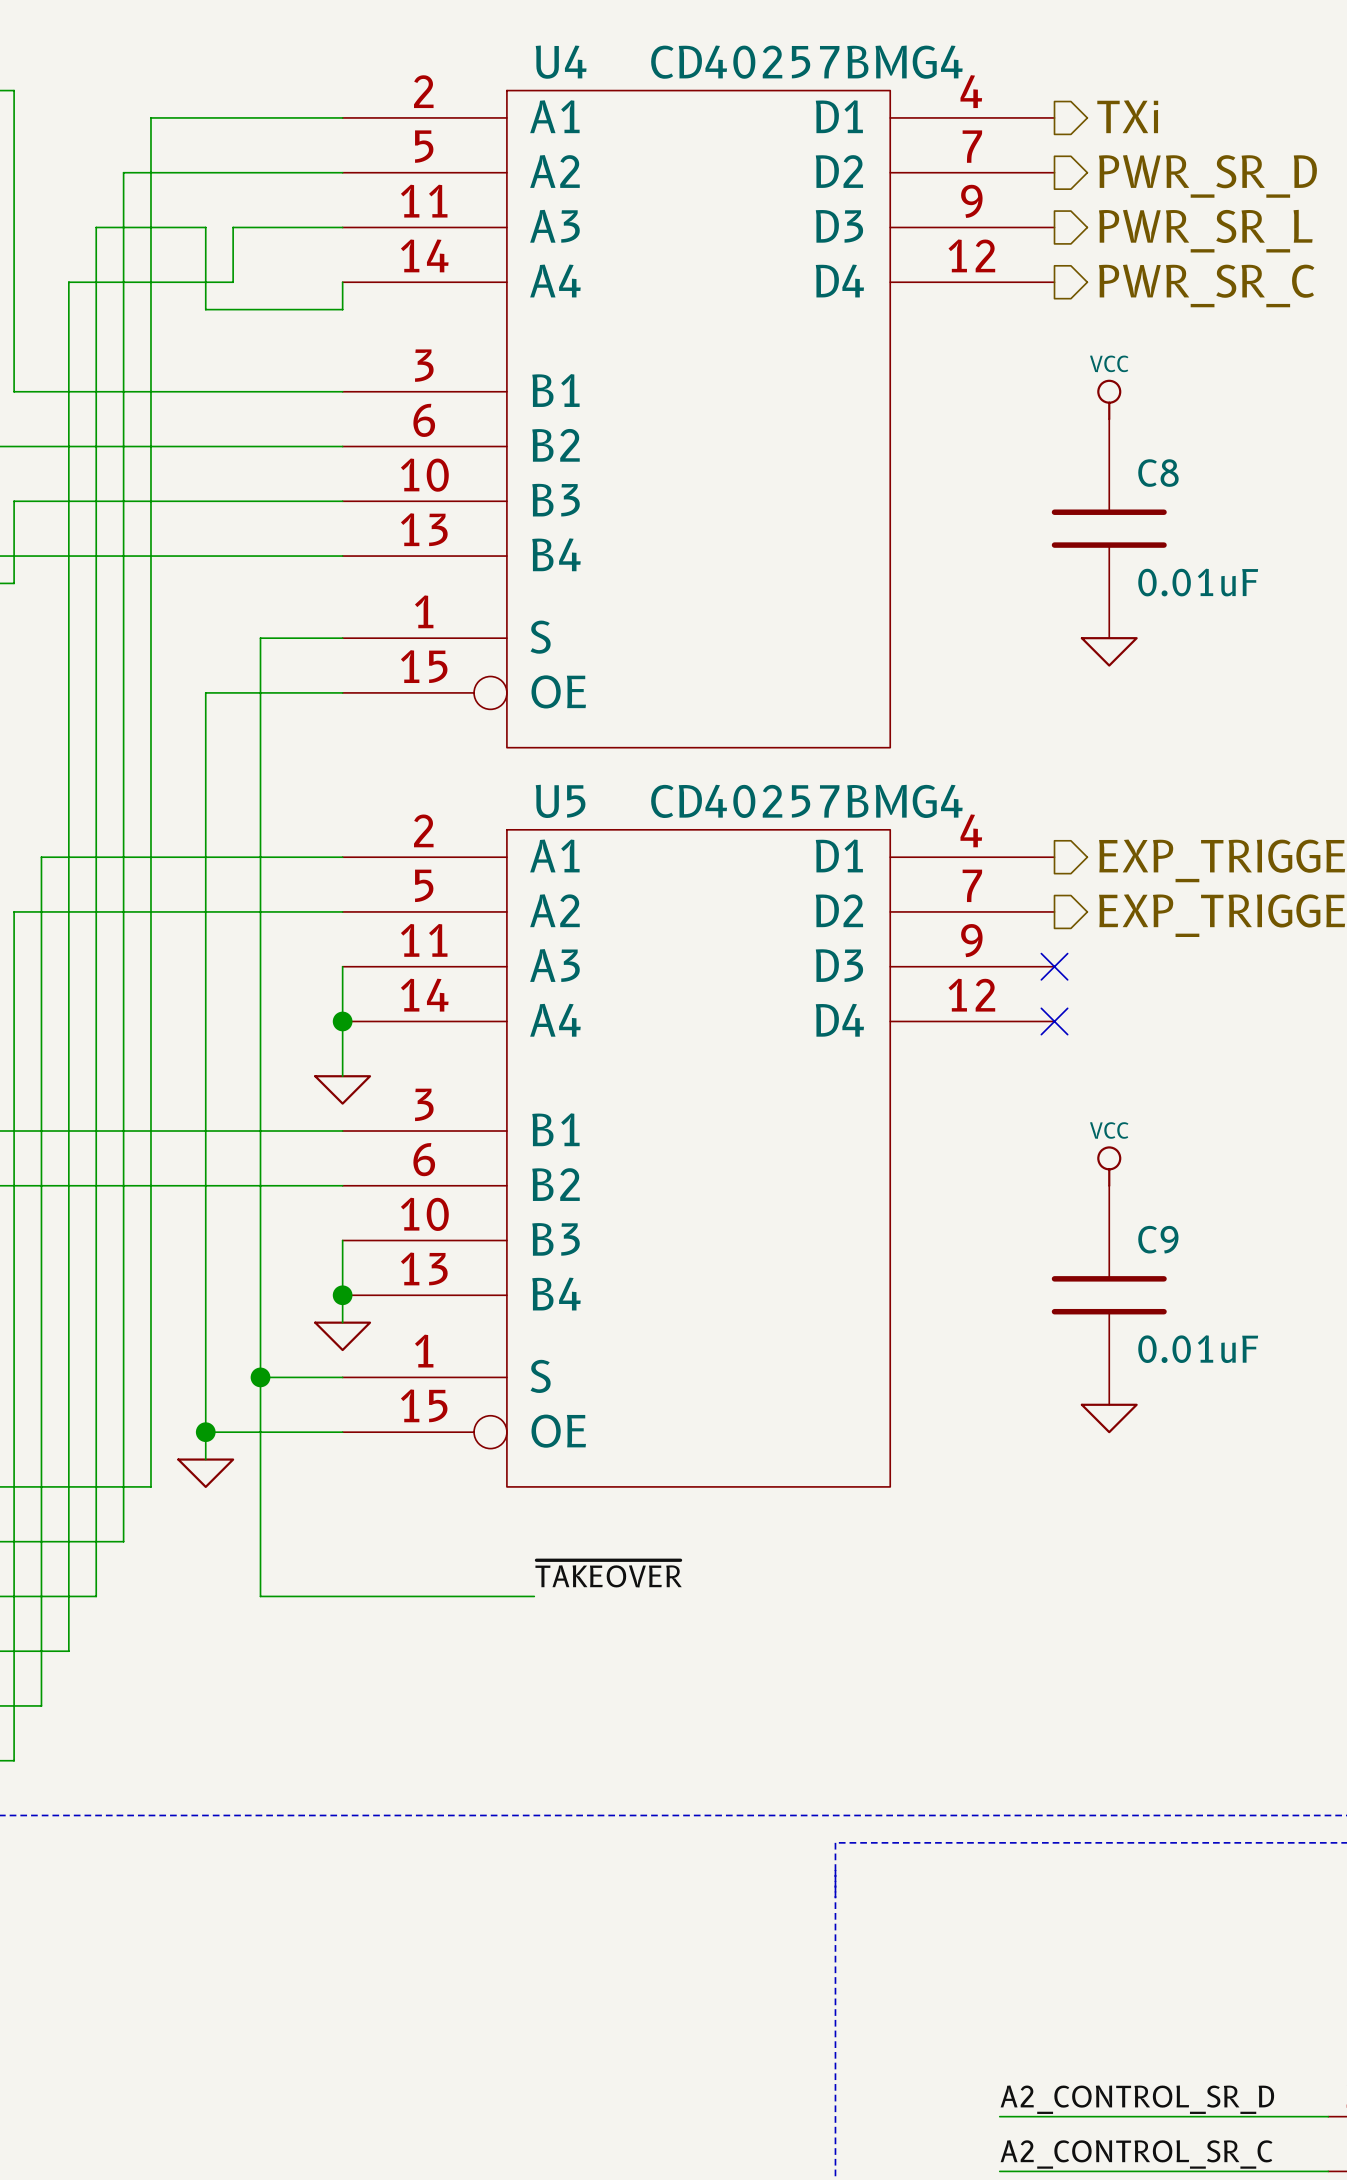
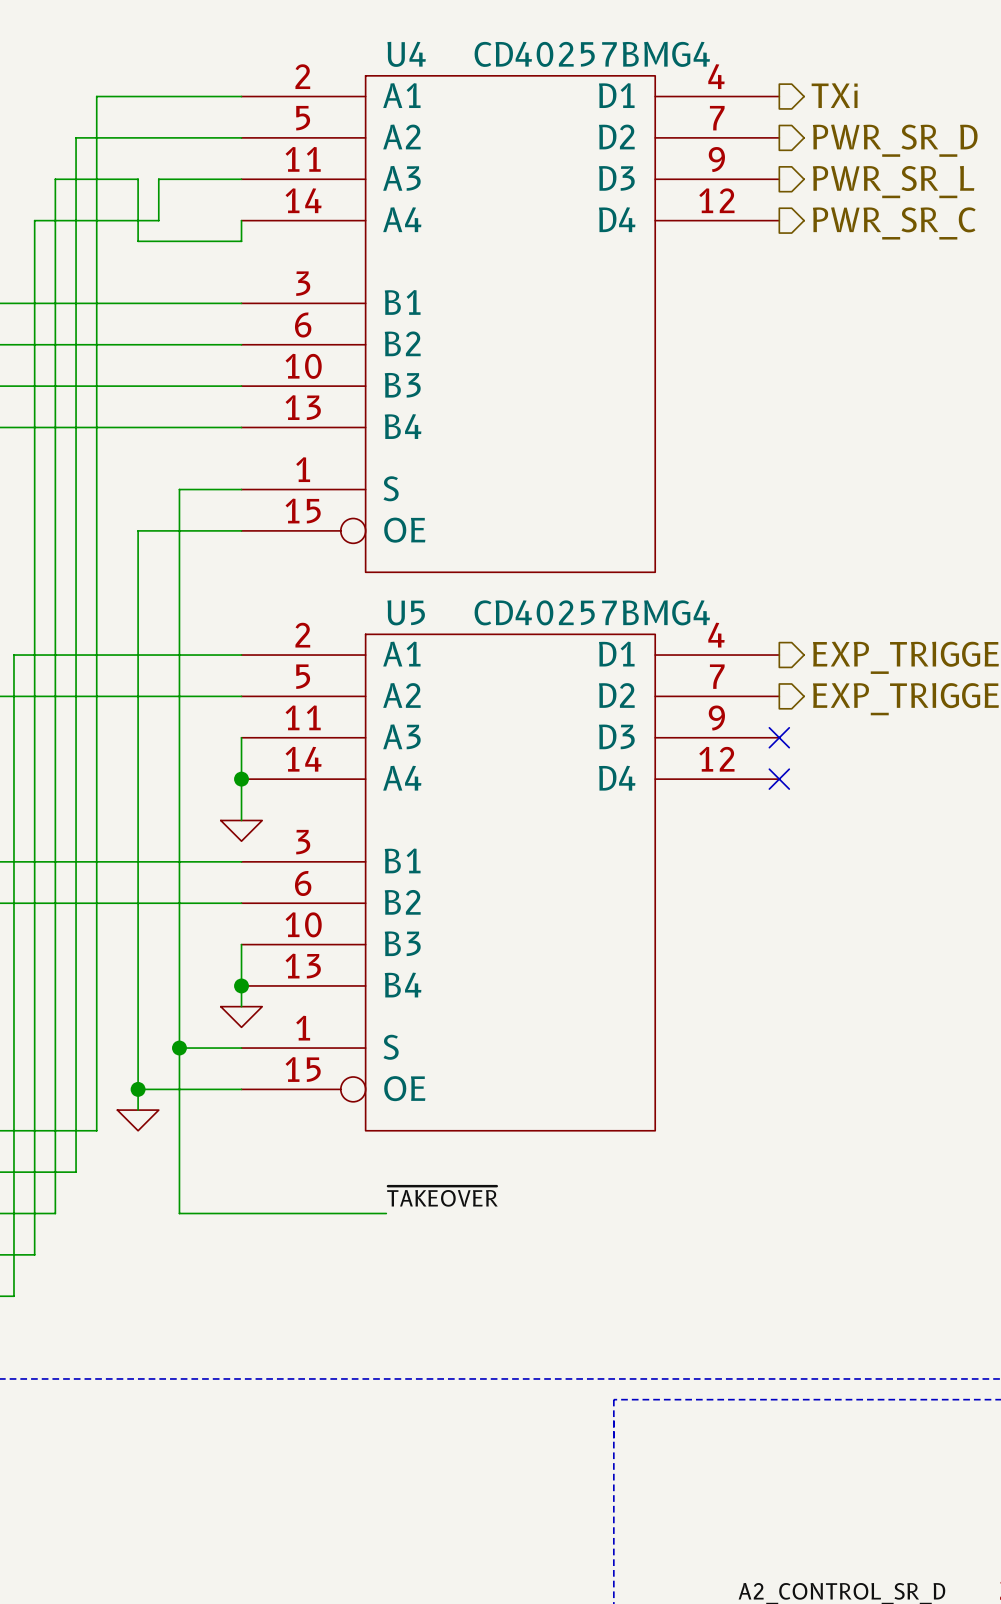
power symbol: VCC (1109, 399) -> none
C8: 0.01uF (1109, 528) -> none
power symbol: (1109, 651) -> none
power symbol: VCC (1109, 1166) -> none
C9: 0.01uF (1109, 1295) -> none
power symbol: (1109, 1418) -> none

